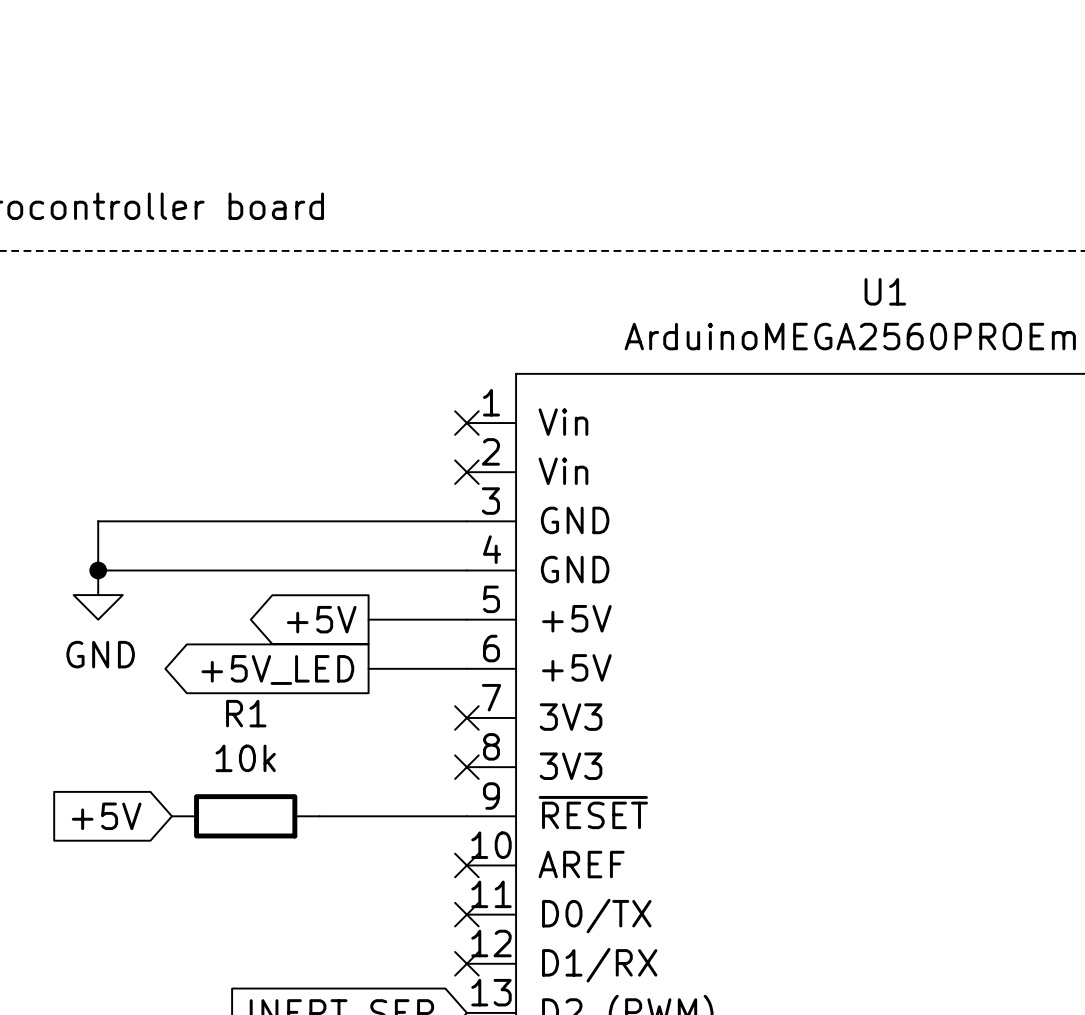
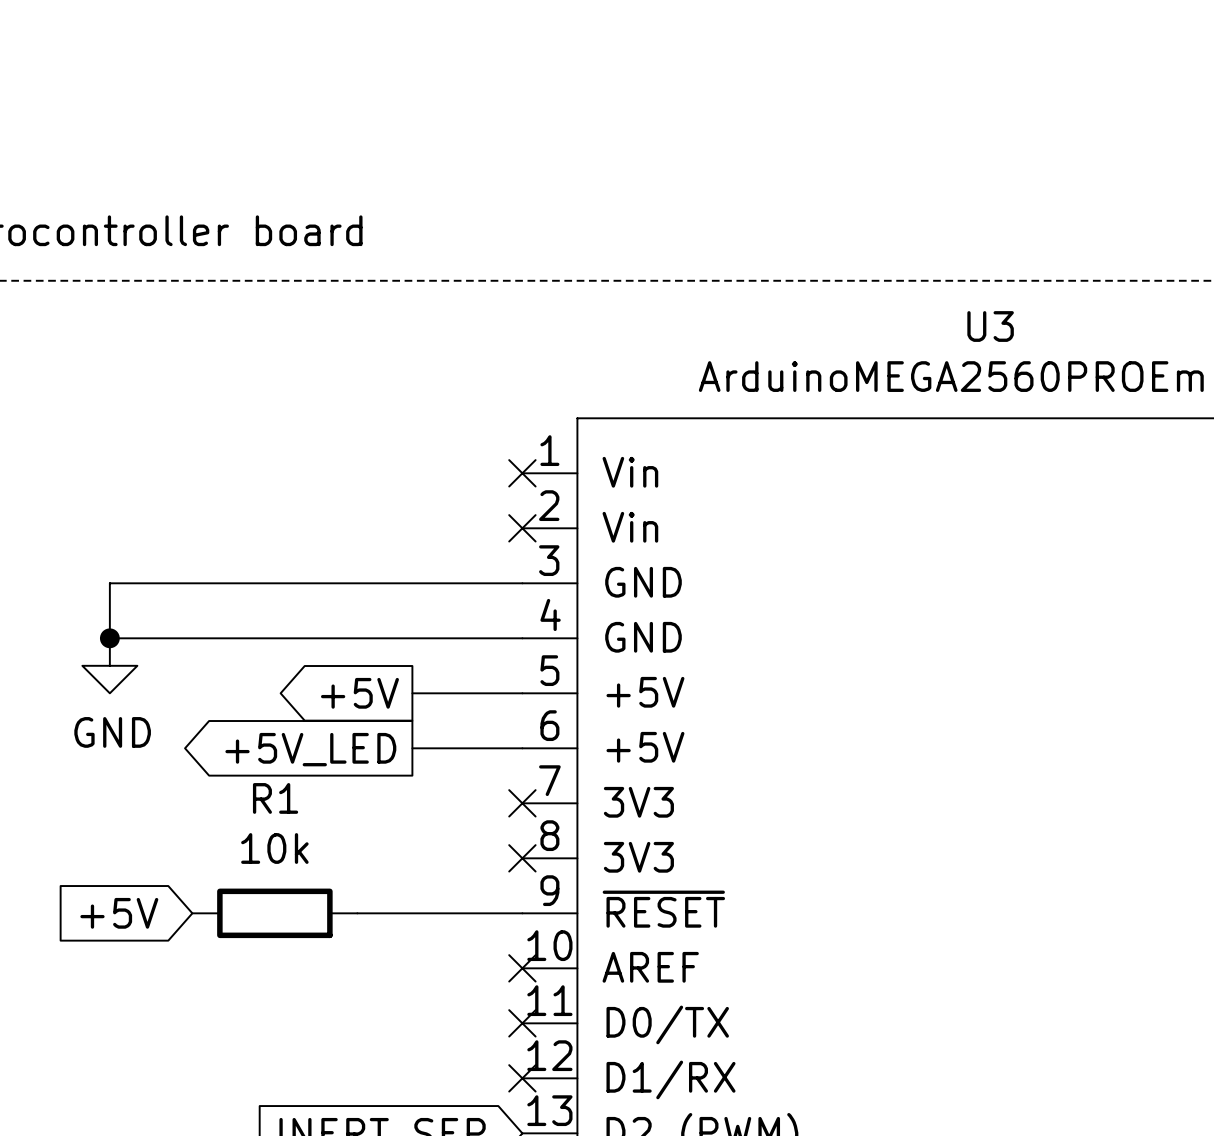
U1 name: U1 (885, 291) -> U3 (990, 326)

